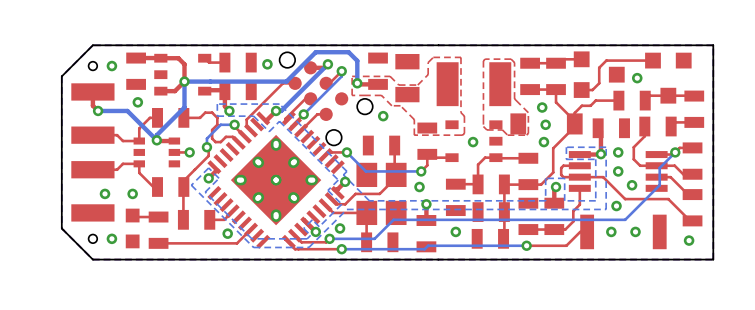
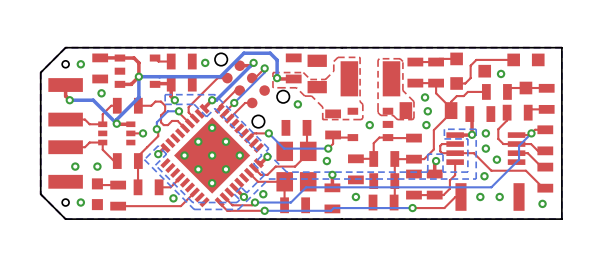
part footprint: [207, 111, 345, 249] -> [160, 103, 264, 208]

